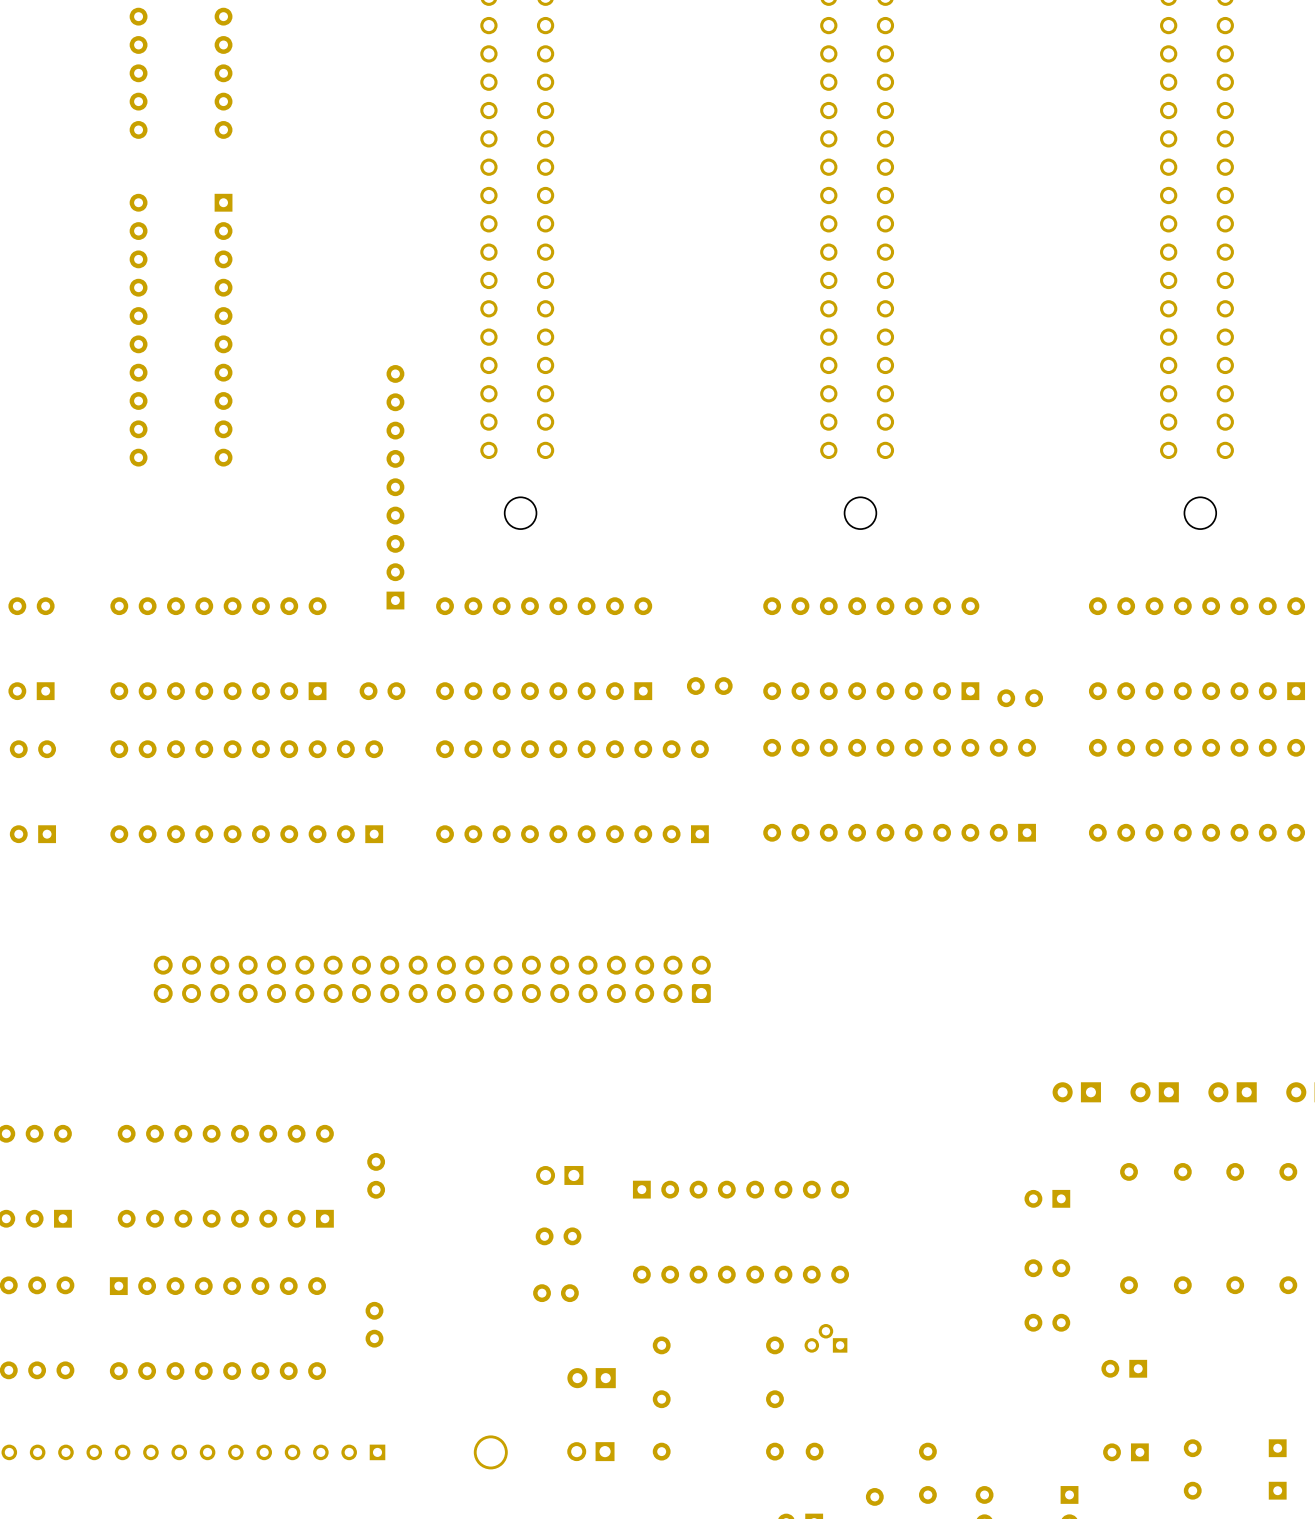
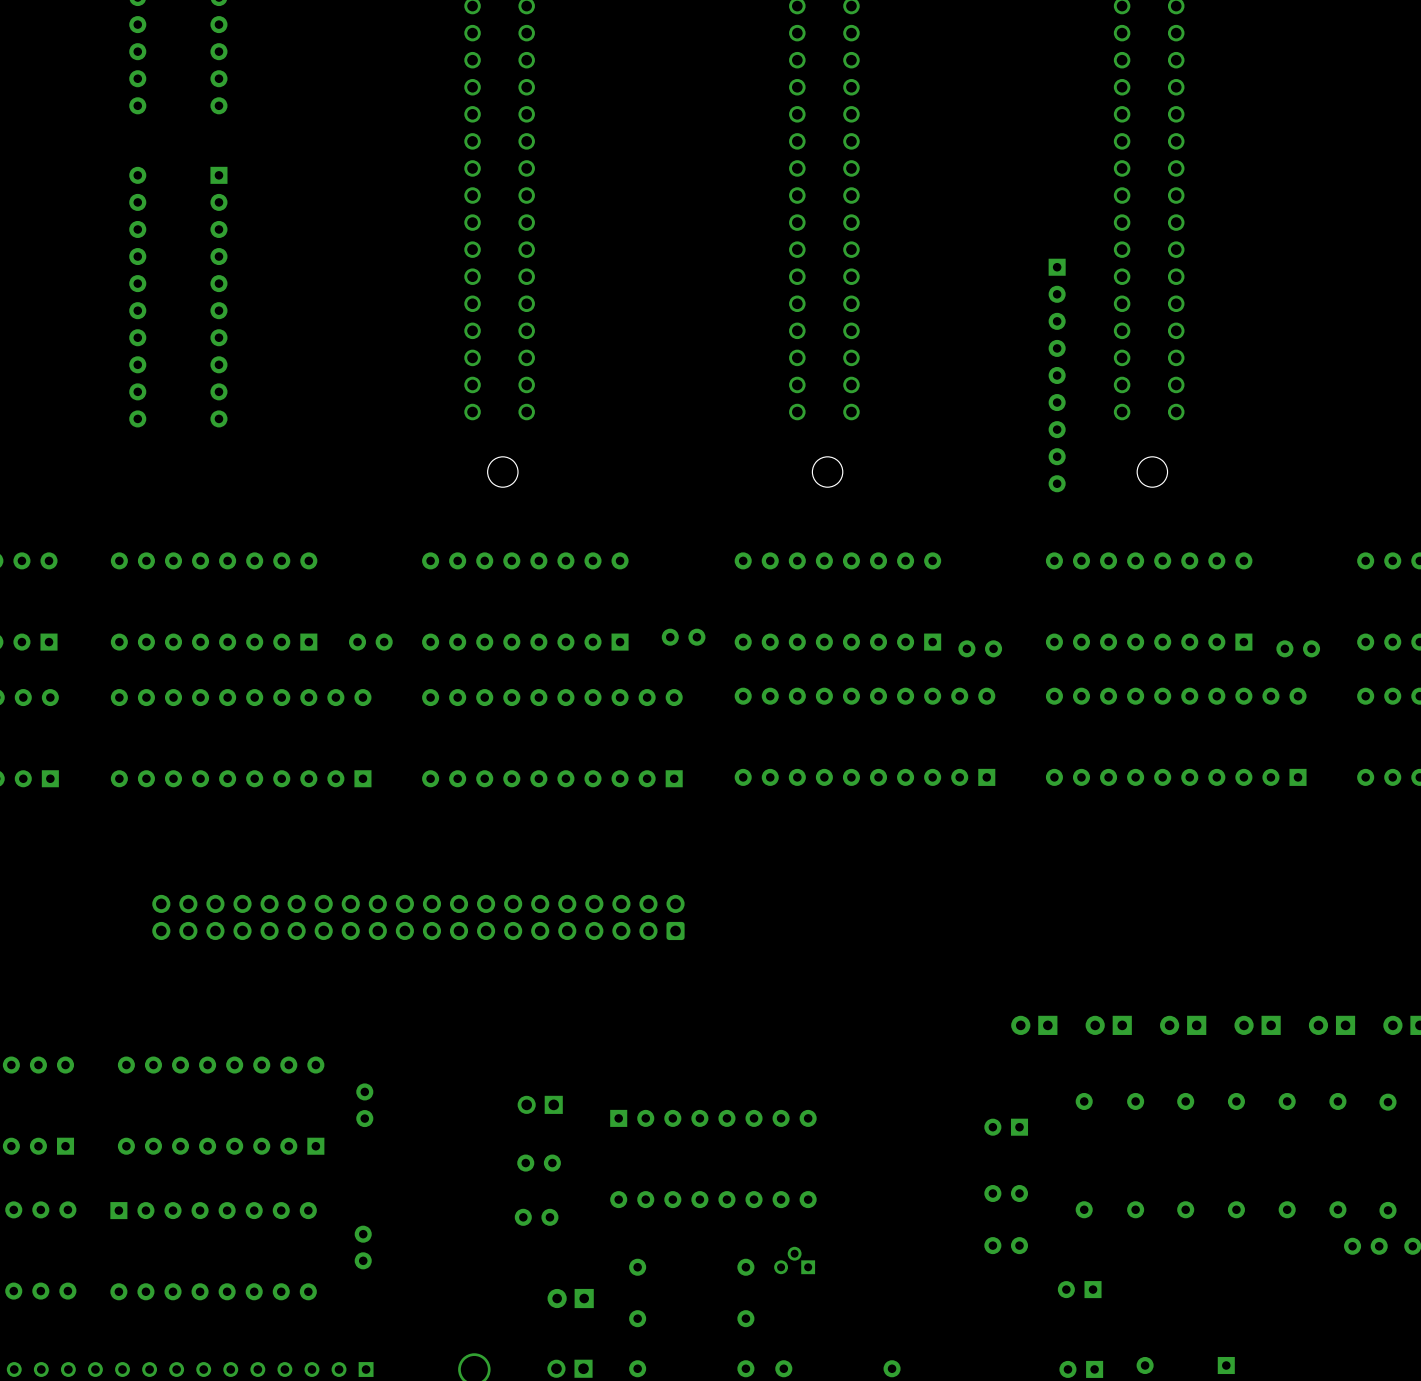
part: none -> (1057, 375)
part: (395, 487) -> none

